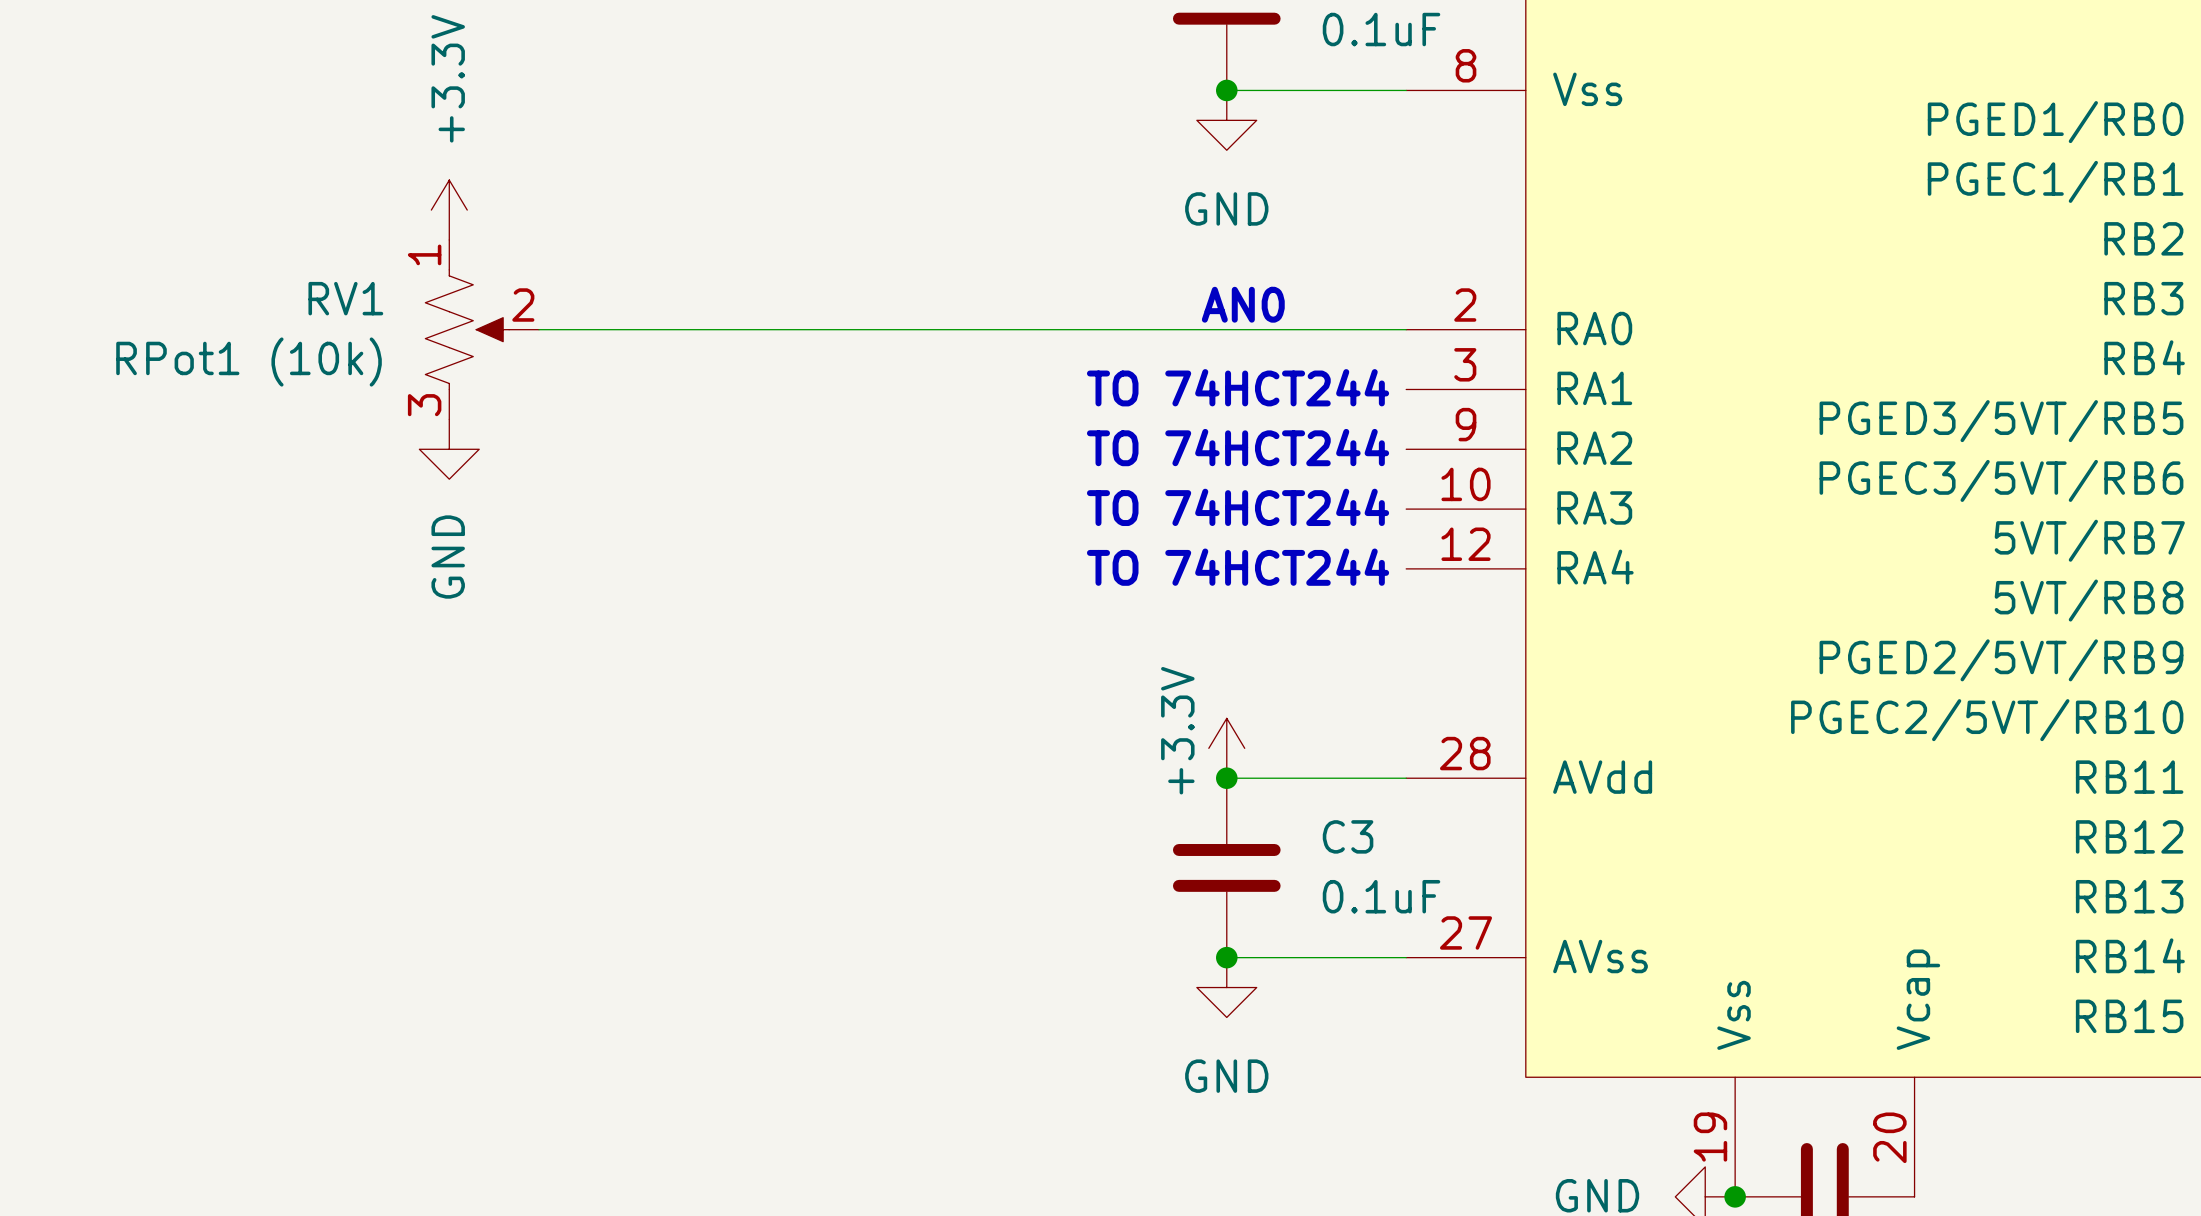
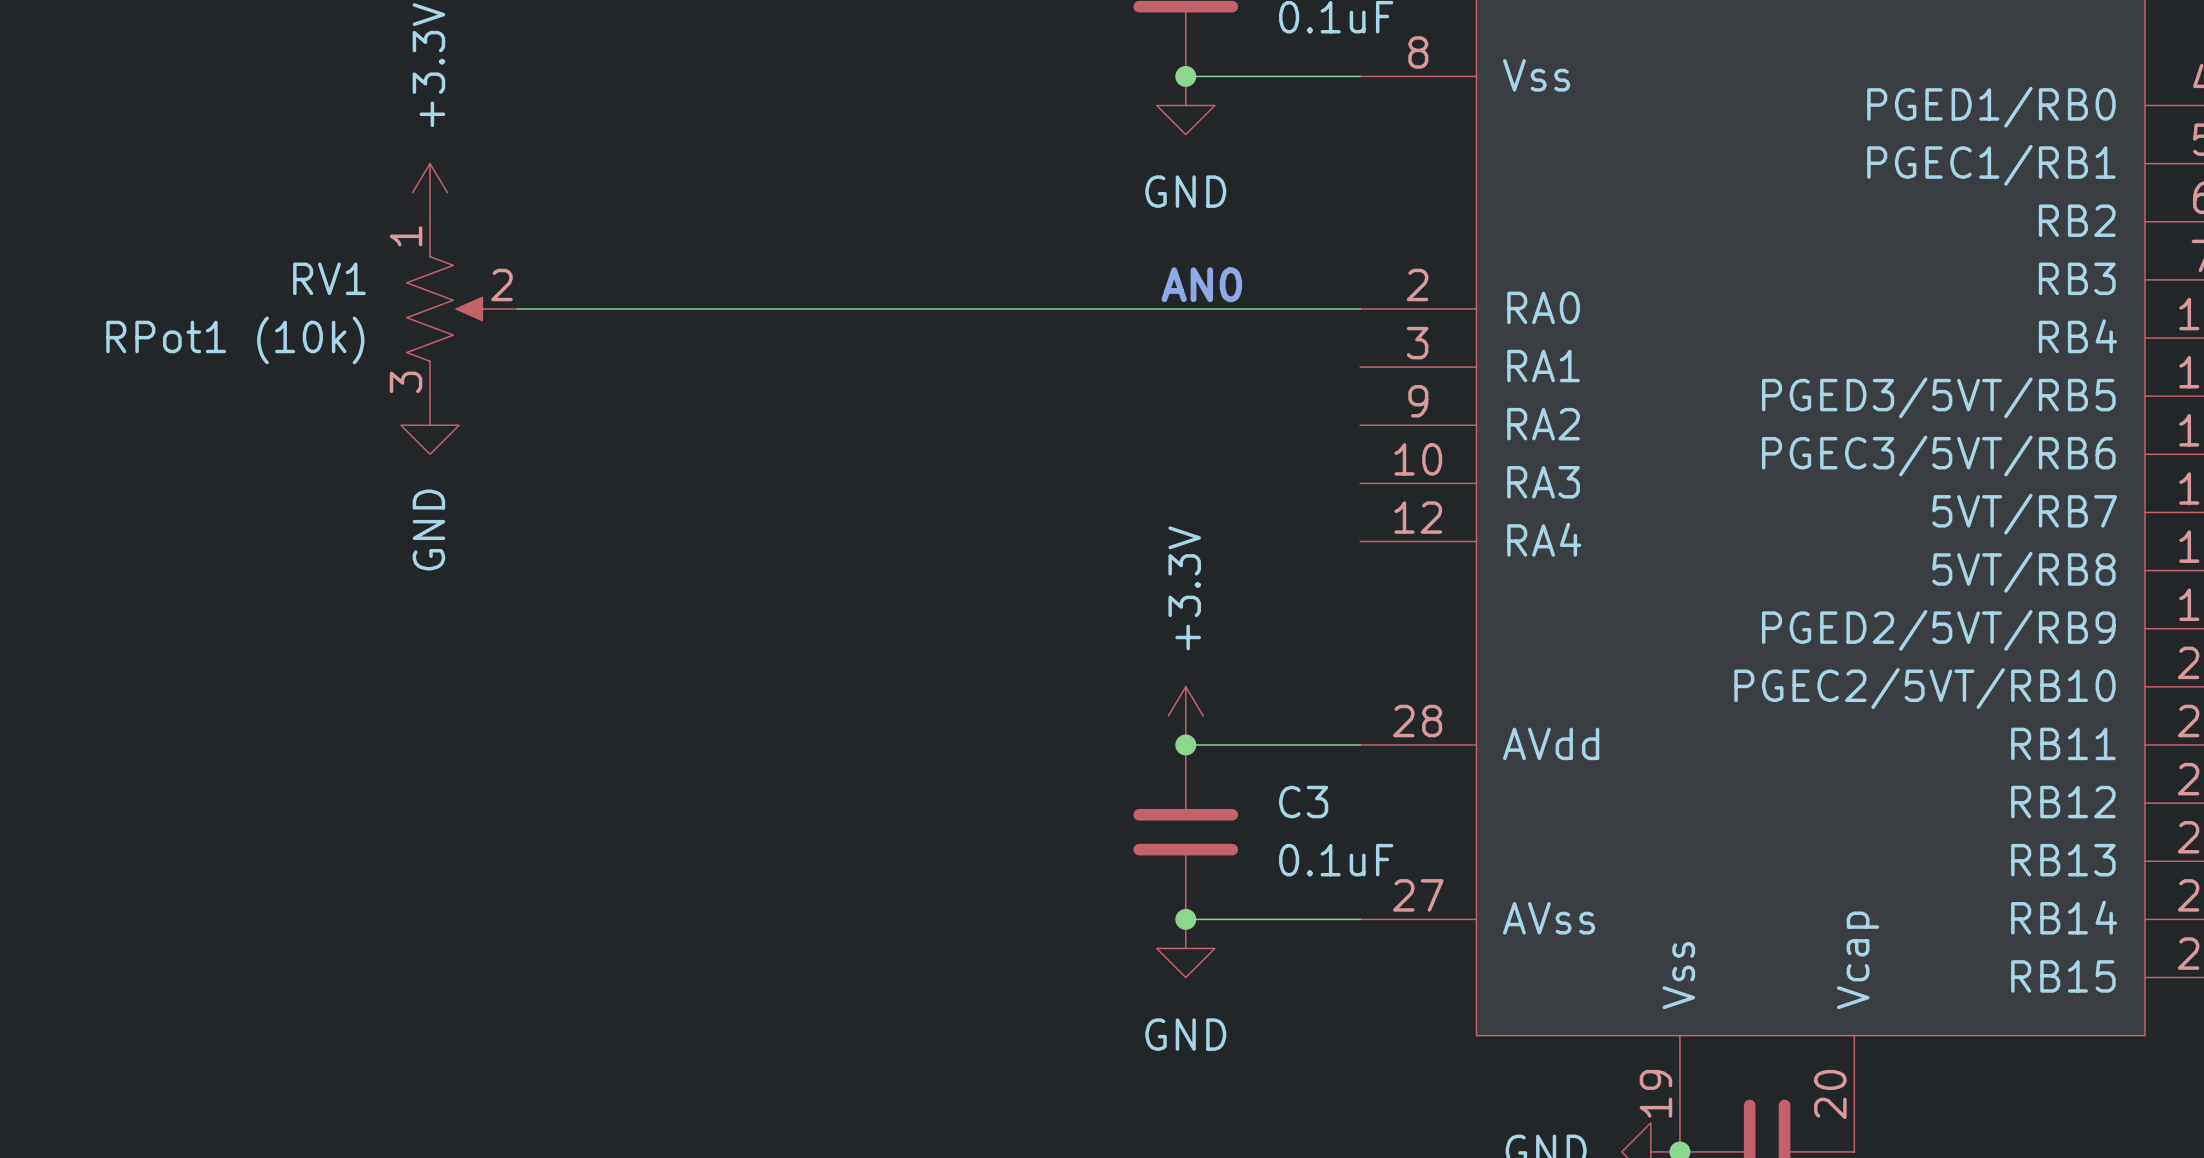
text: TO 74HCT244 (1238, 387) -> none
text: TO 74HCT244 (1238, 447) -> none
text: TO 74HCT244 (1238, 507) -> none
text: TO 74HCT244 (1238, 567) -> none
power symbol text position: +3.3V (1177, 730) -> +3.3V (1184, 588)

